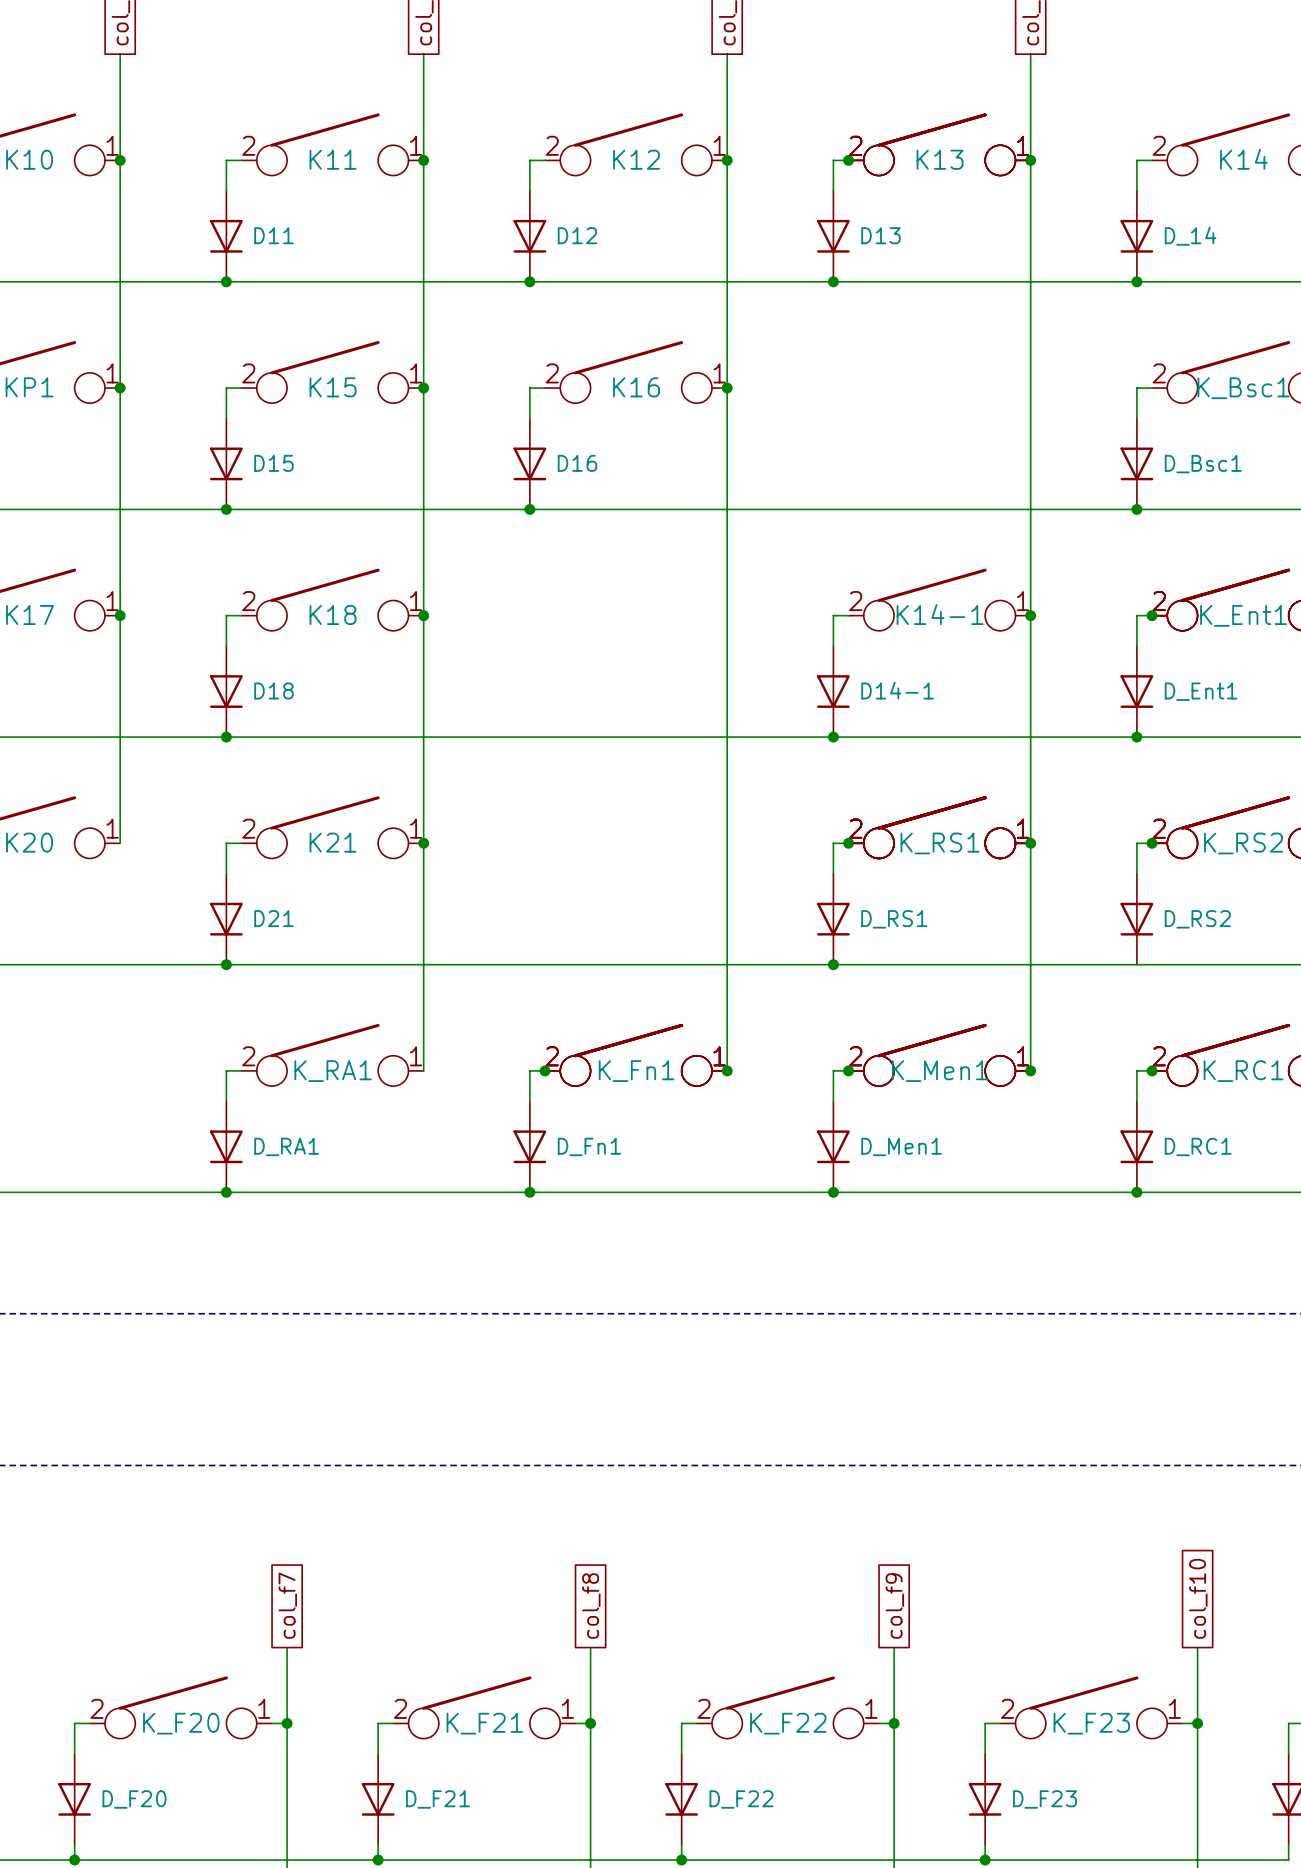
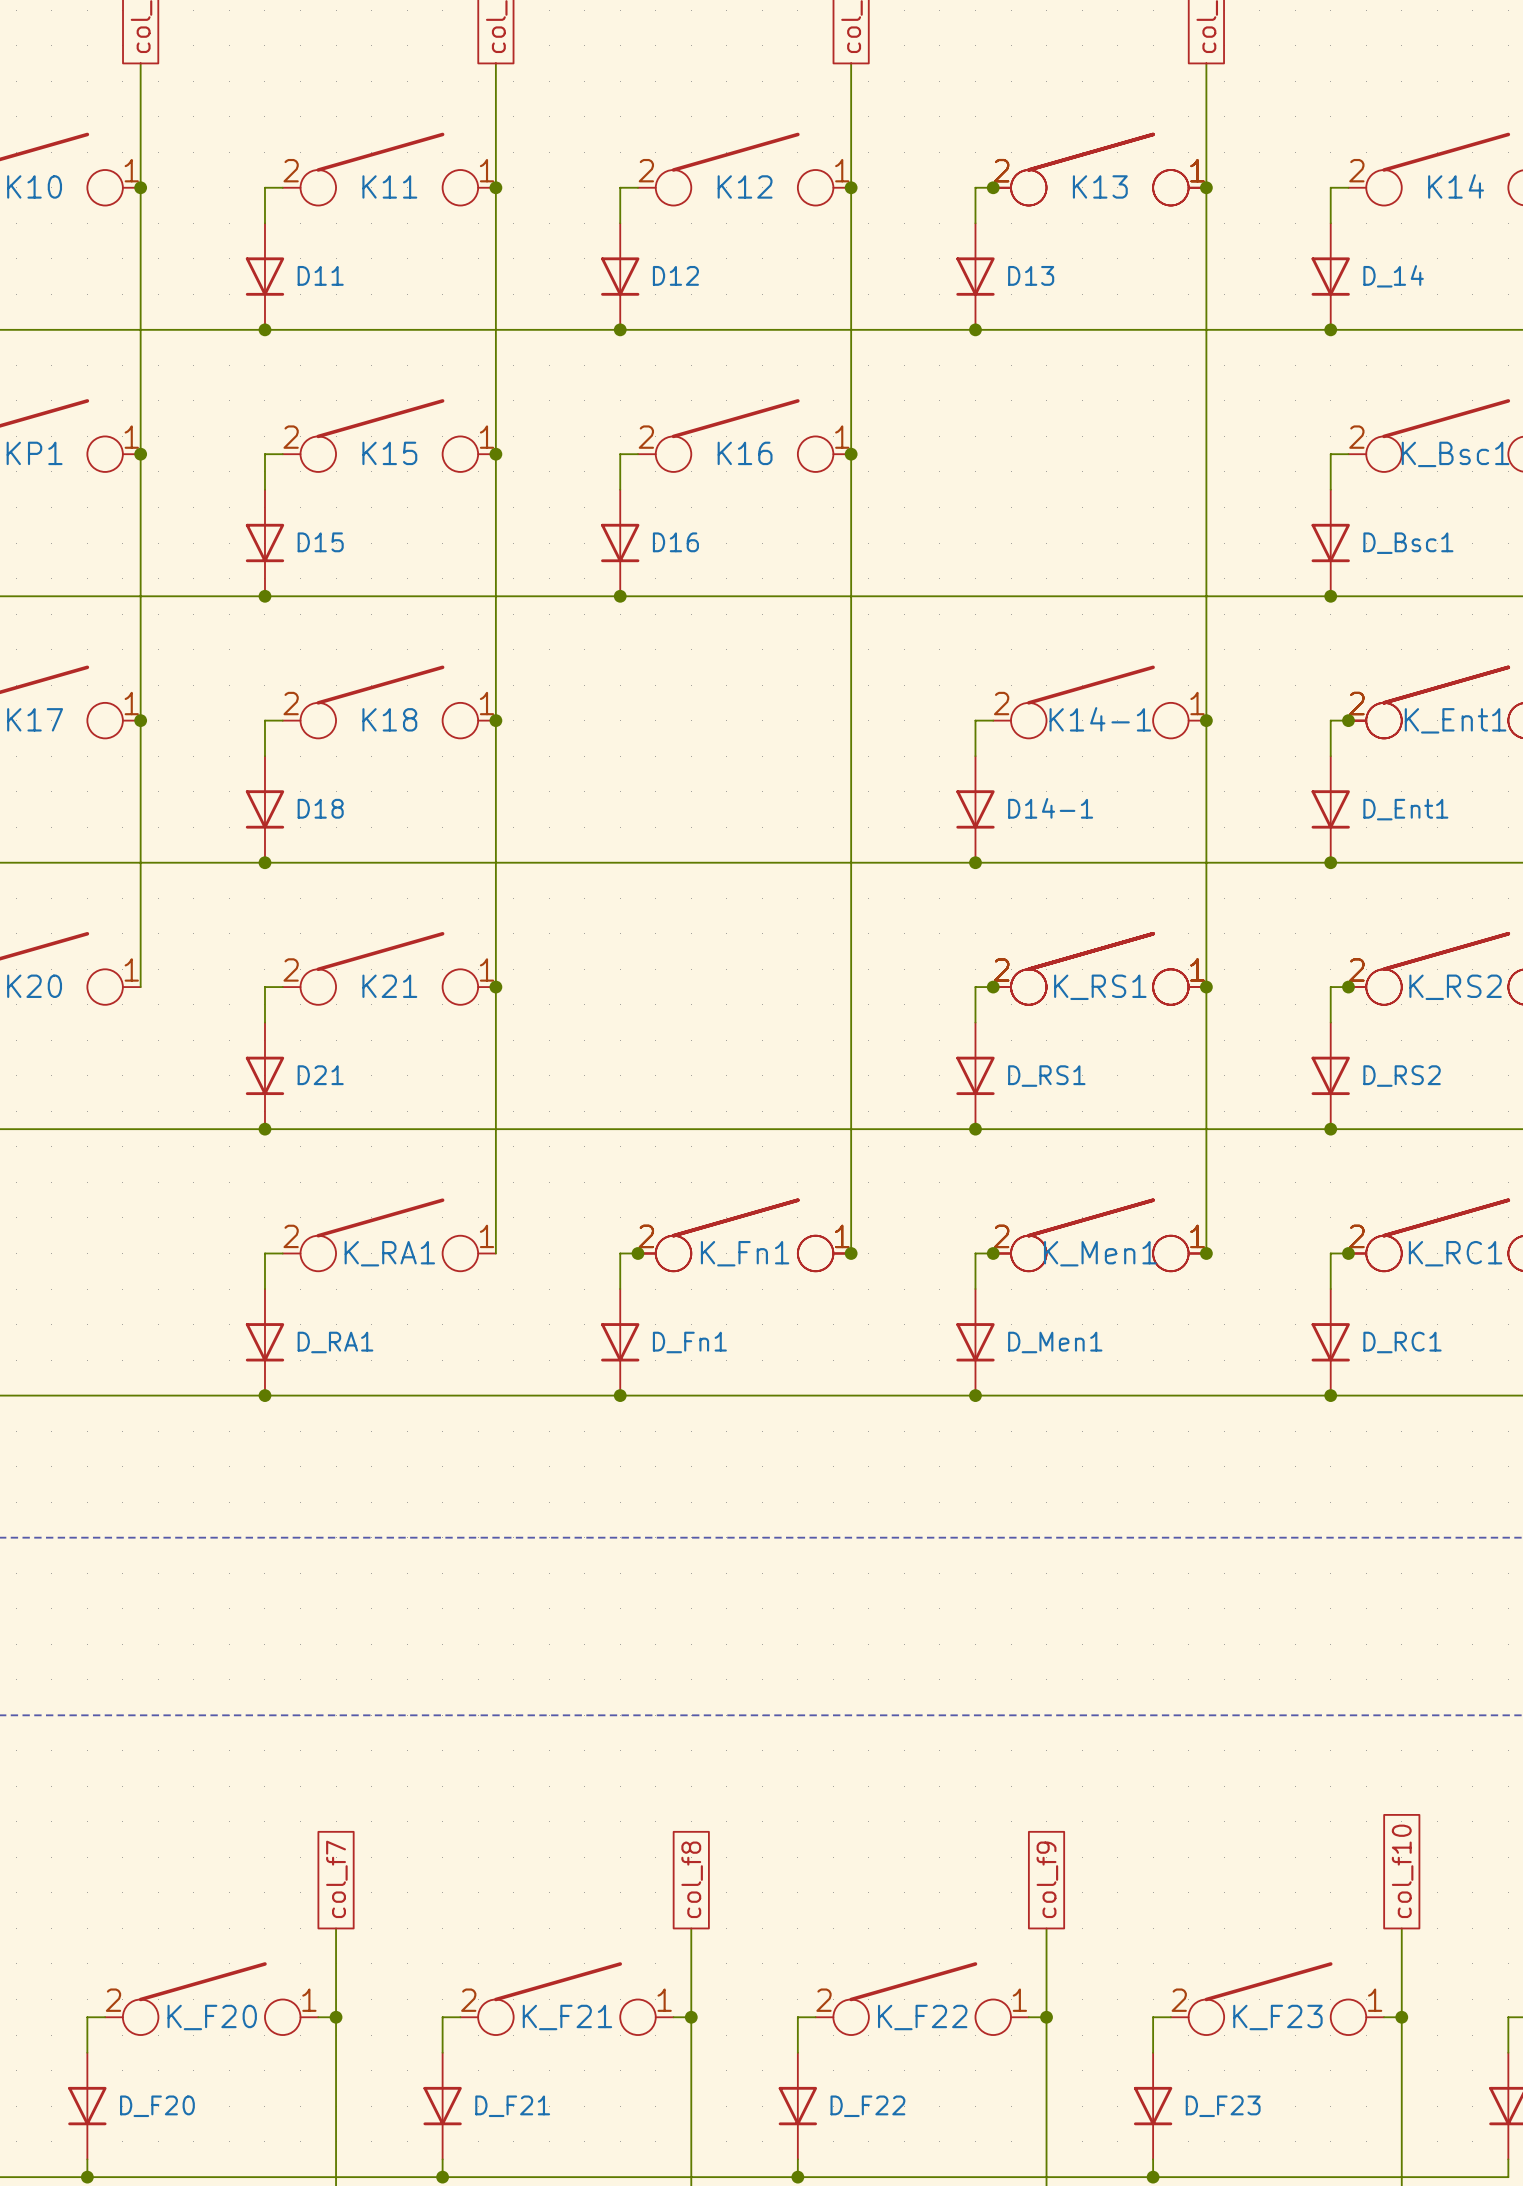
junction: none -> (1330, 1129)

